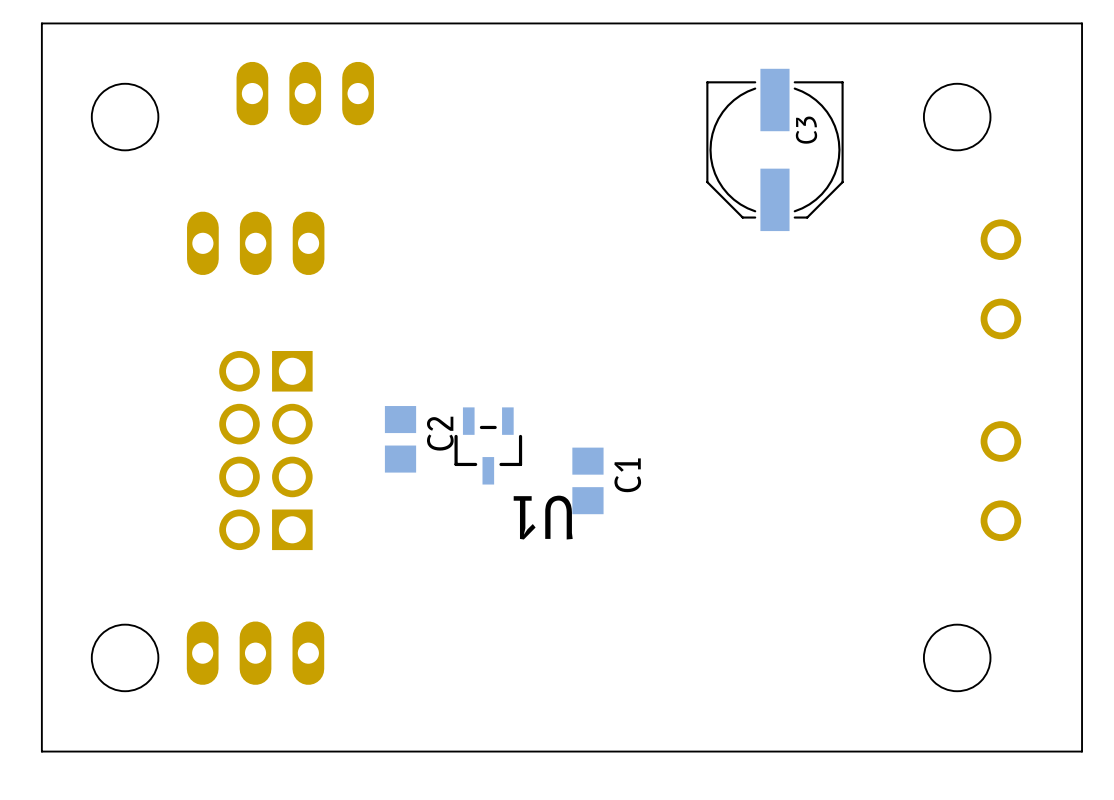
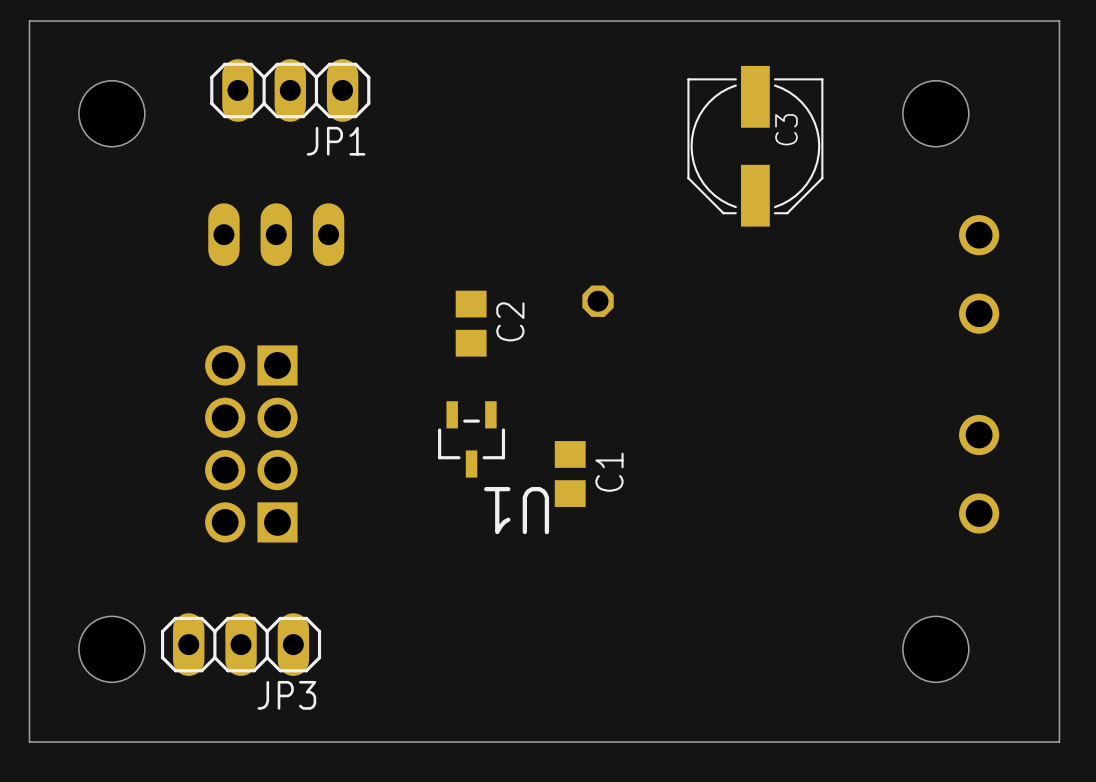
JP1 side: top (305, 93) -> bottom (290, 90)
part position: (255, 243) -> (276, 234)
part: none -> (598, 301)
C2 position: (400, 439) -> (471, 323)
JP3 side: top (255, 653) -> bottom (241, 644)

